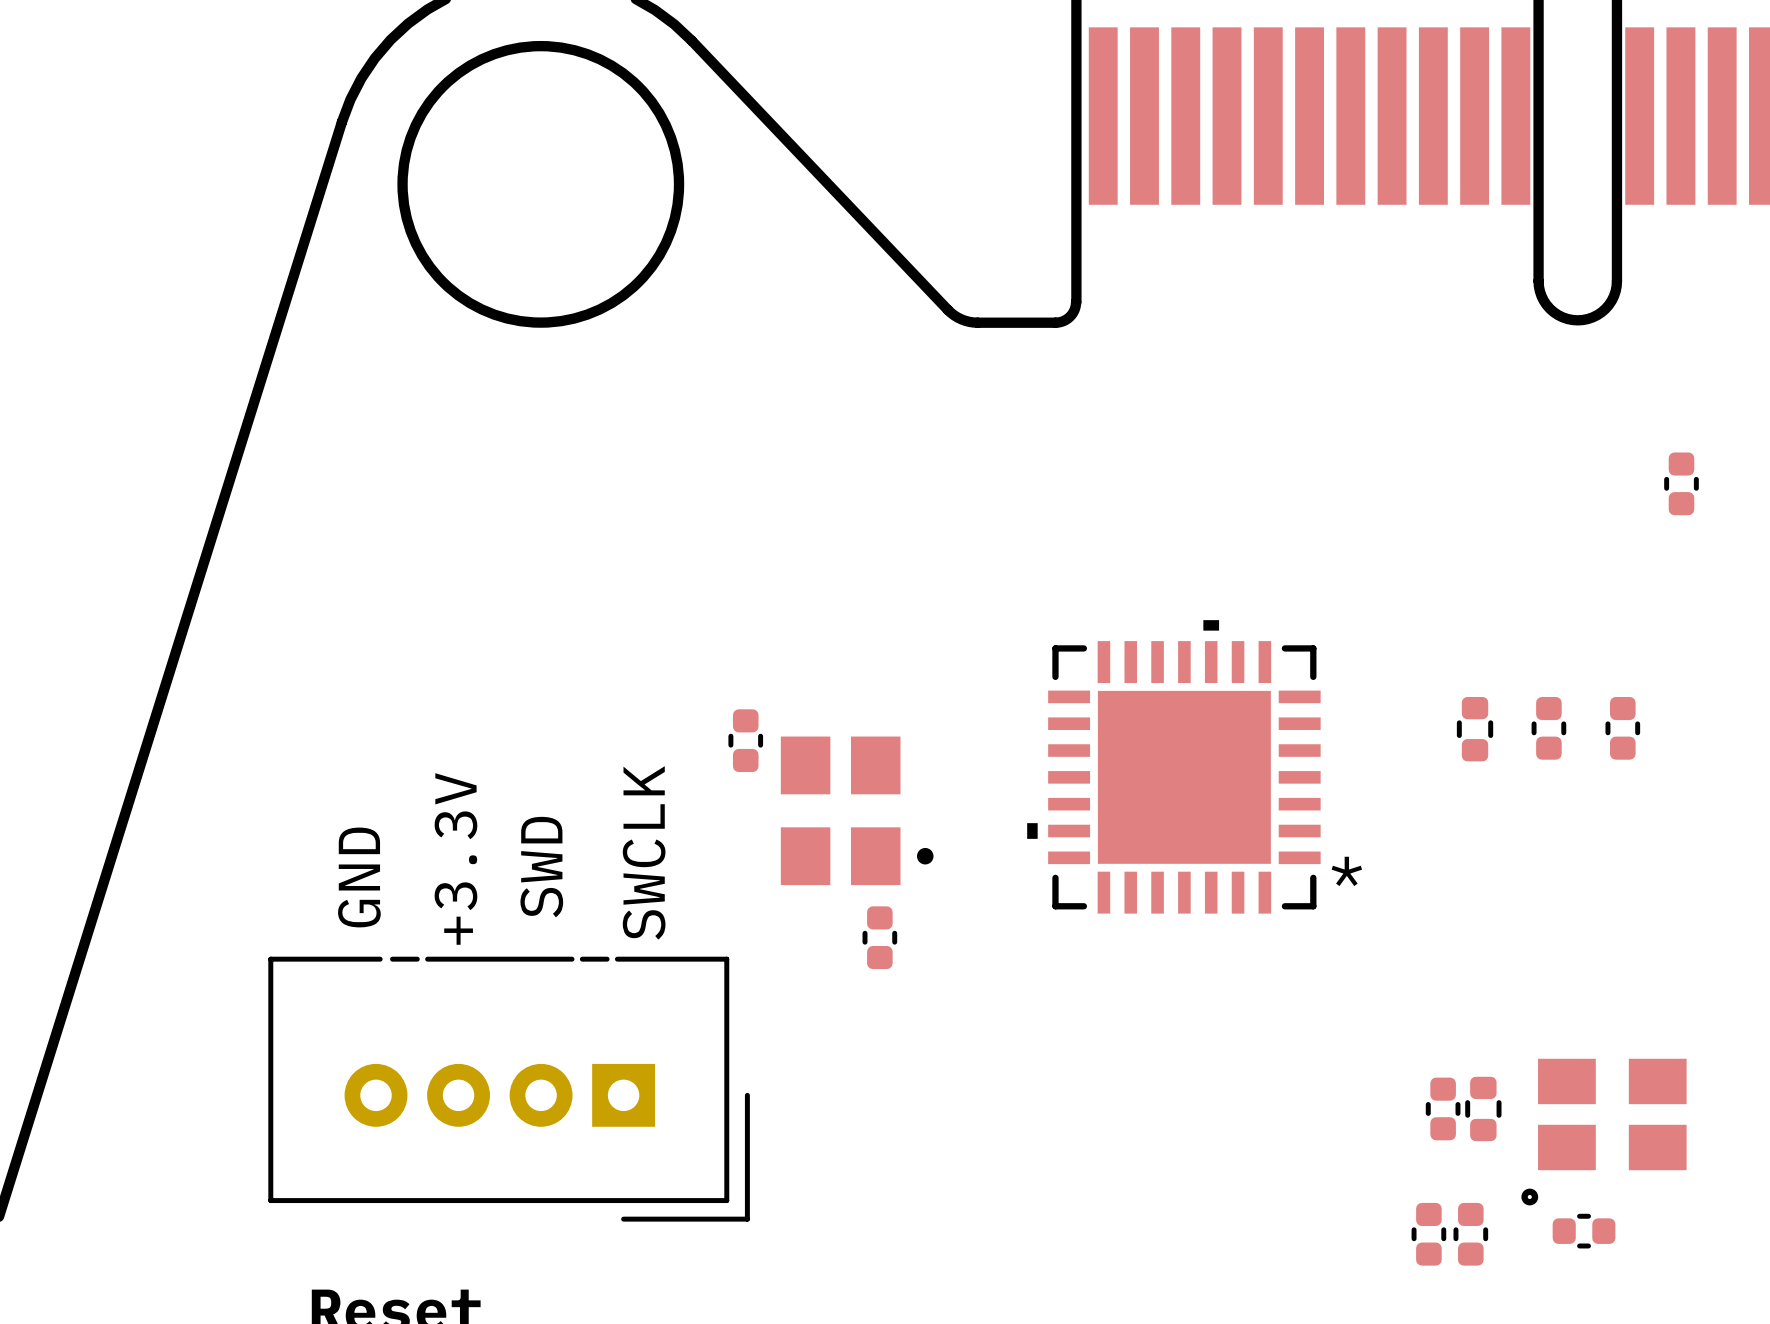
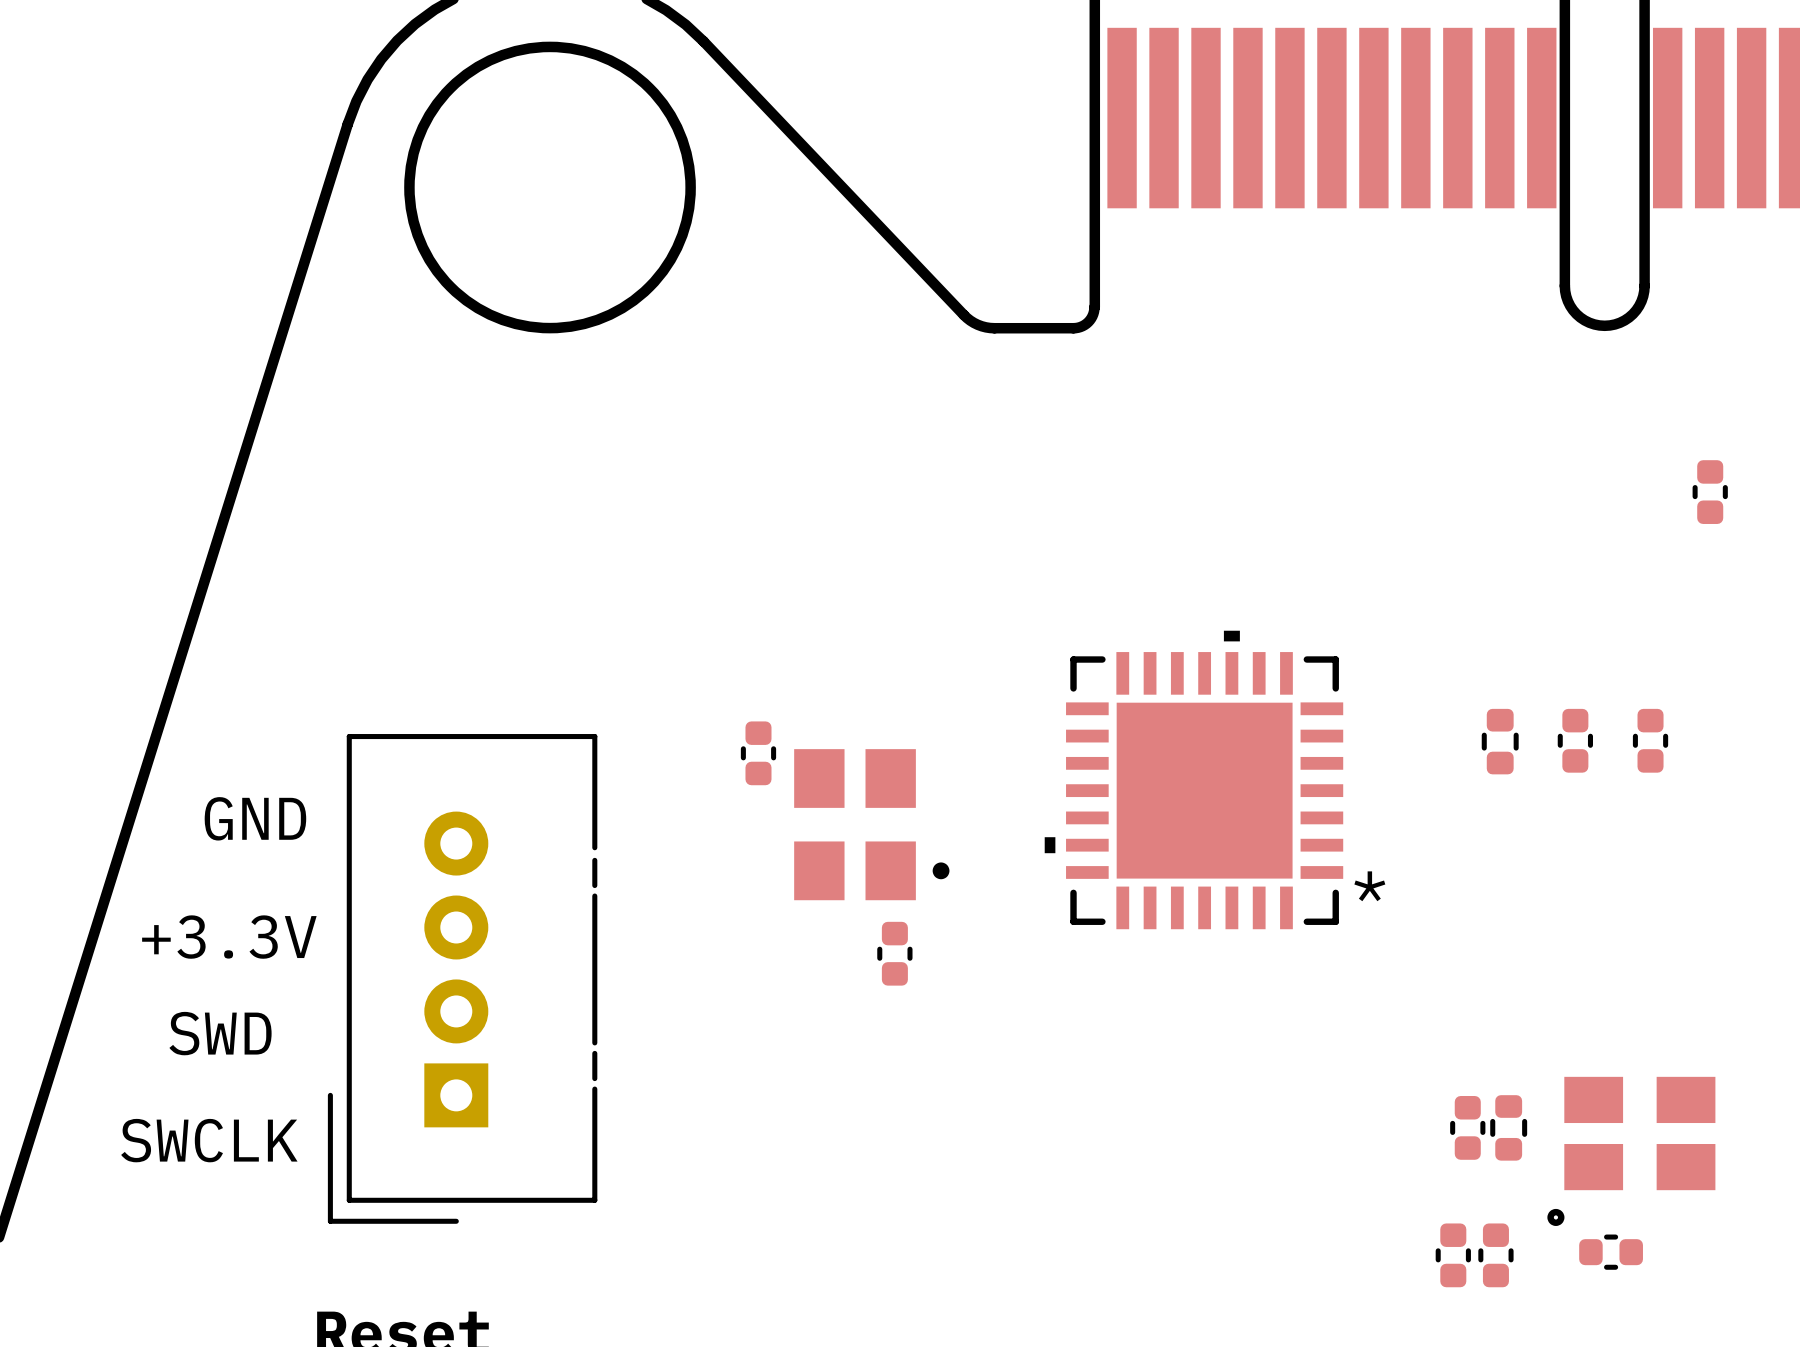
text rotation: 0° (644, 852) -> 90° clockwise (209, 1140)
text position: SWCLK (644, 852) -> SWCLK (209, 1140)
text rotation: 0° (455, 858) -> 90° clockwise (229, 937)
text rotation: 0° (541, 867) -> 90° clockwise (220, 1033)
text position: SWD (541, 867) -> SWD (220, 1033)
text rotation: 0° (359, 877) -> 90° clockwise (255, 818)
part rotation: 0° (509, 1089) -> 90° clockwise (462, 978)

